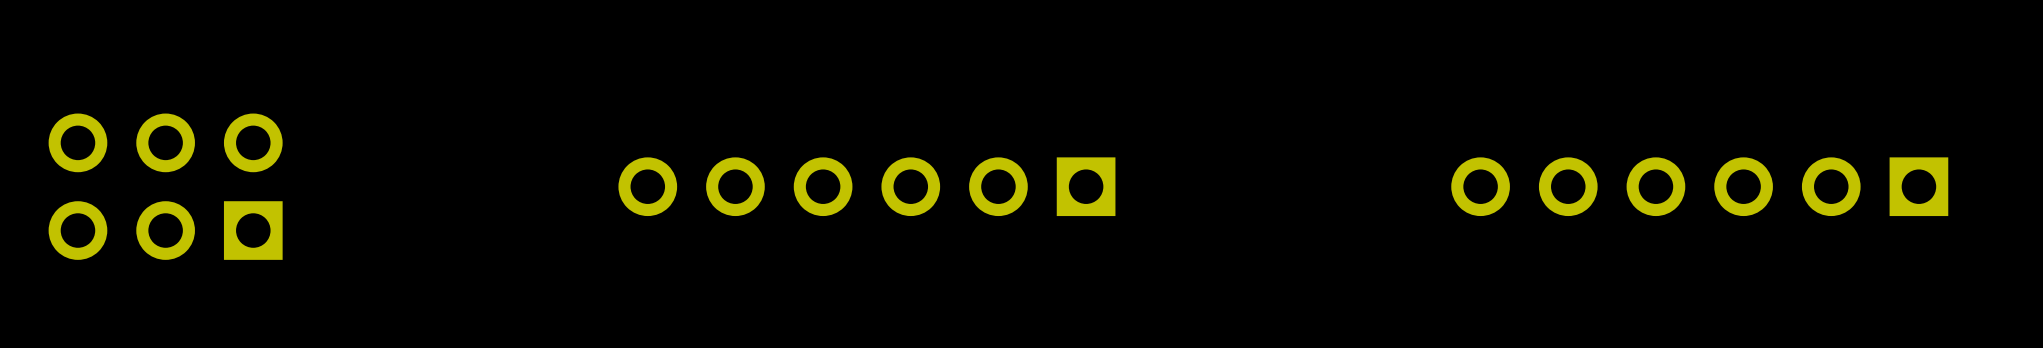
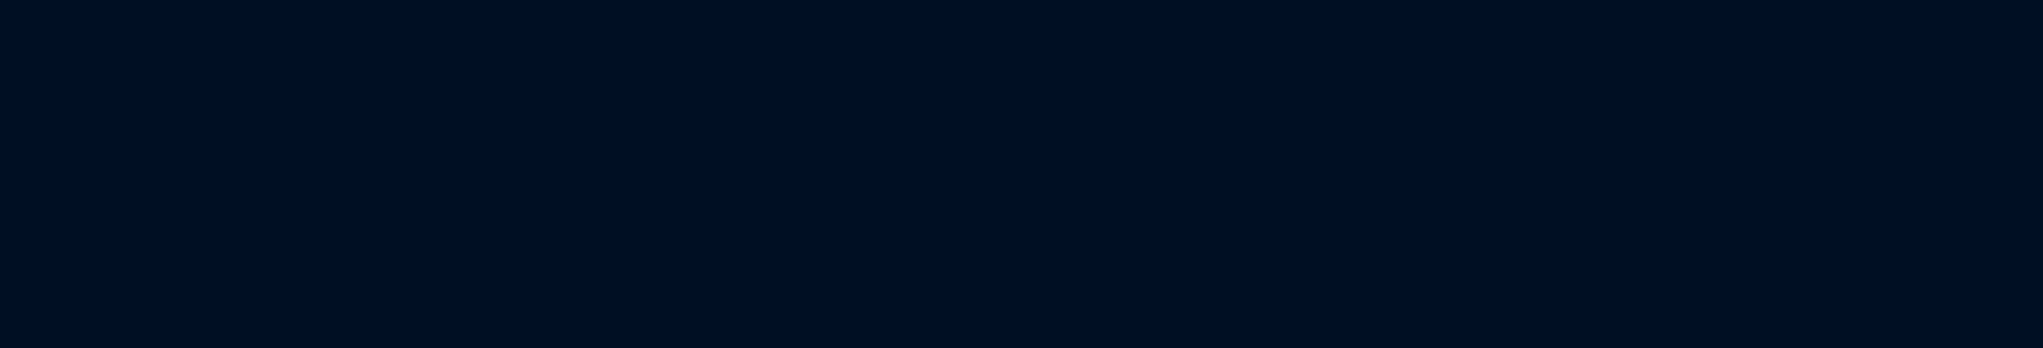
part: (165, 186) -> none
part: (866, 186) -> none
part: (1699, 186) -> none

